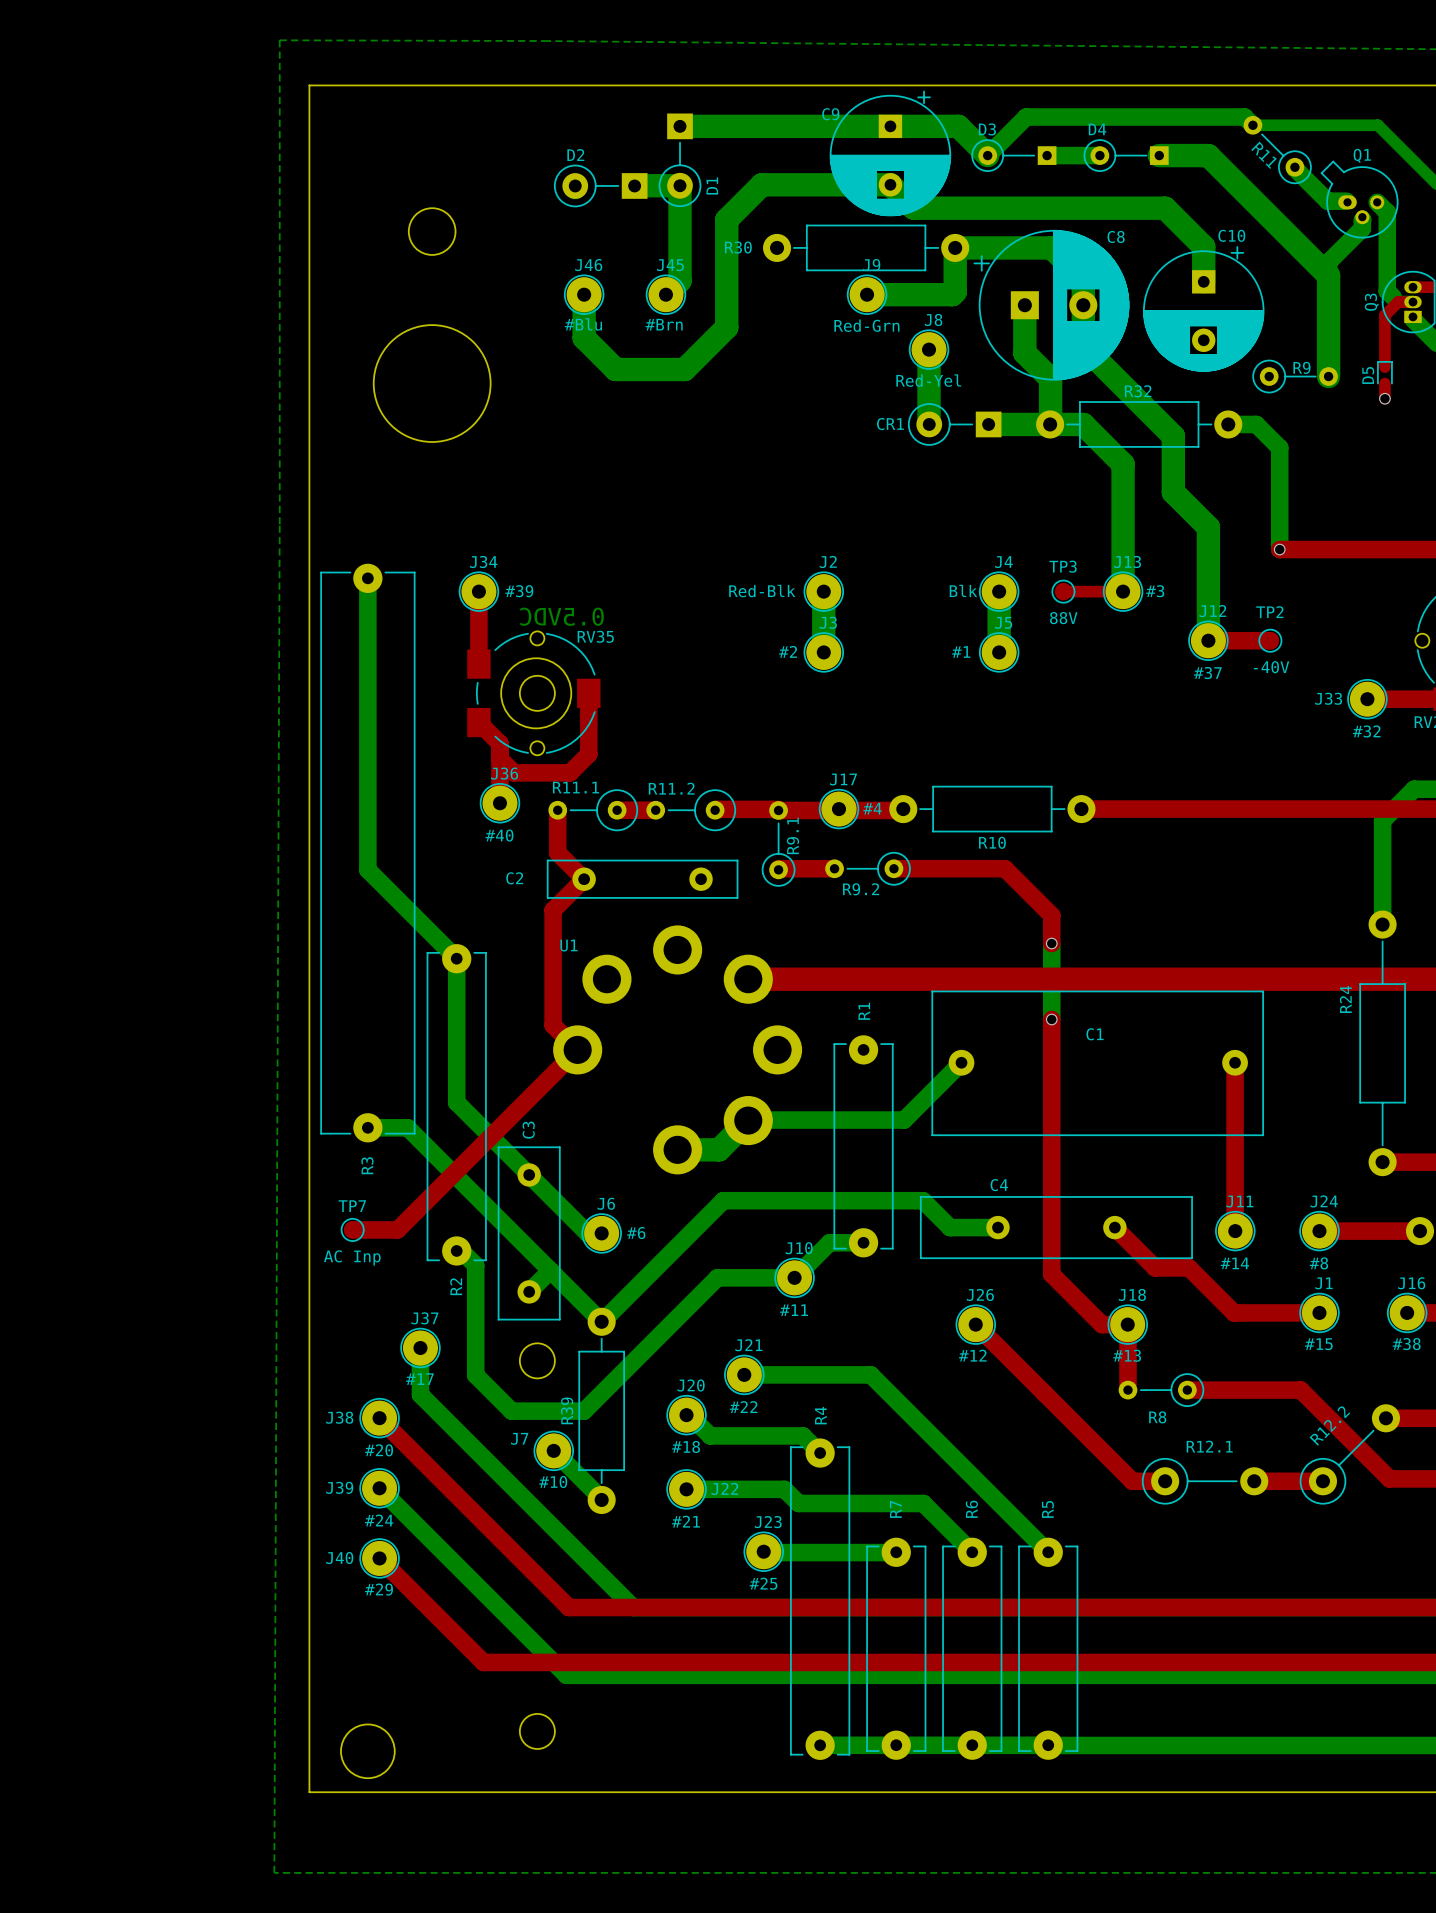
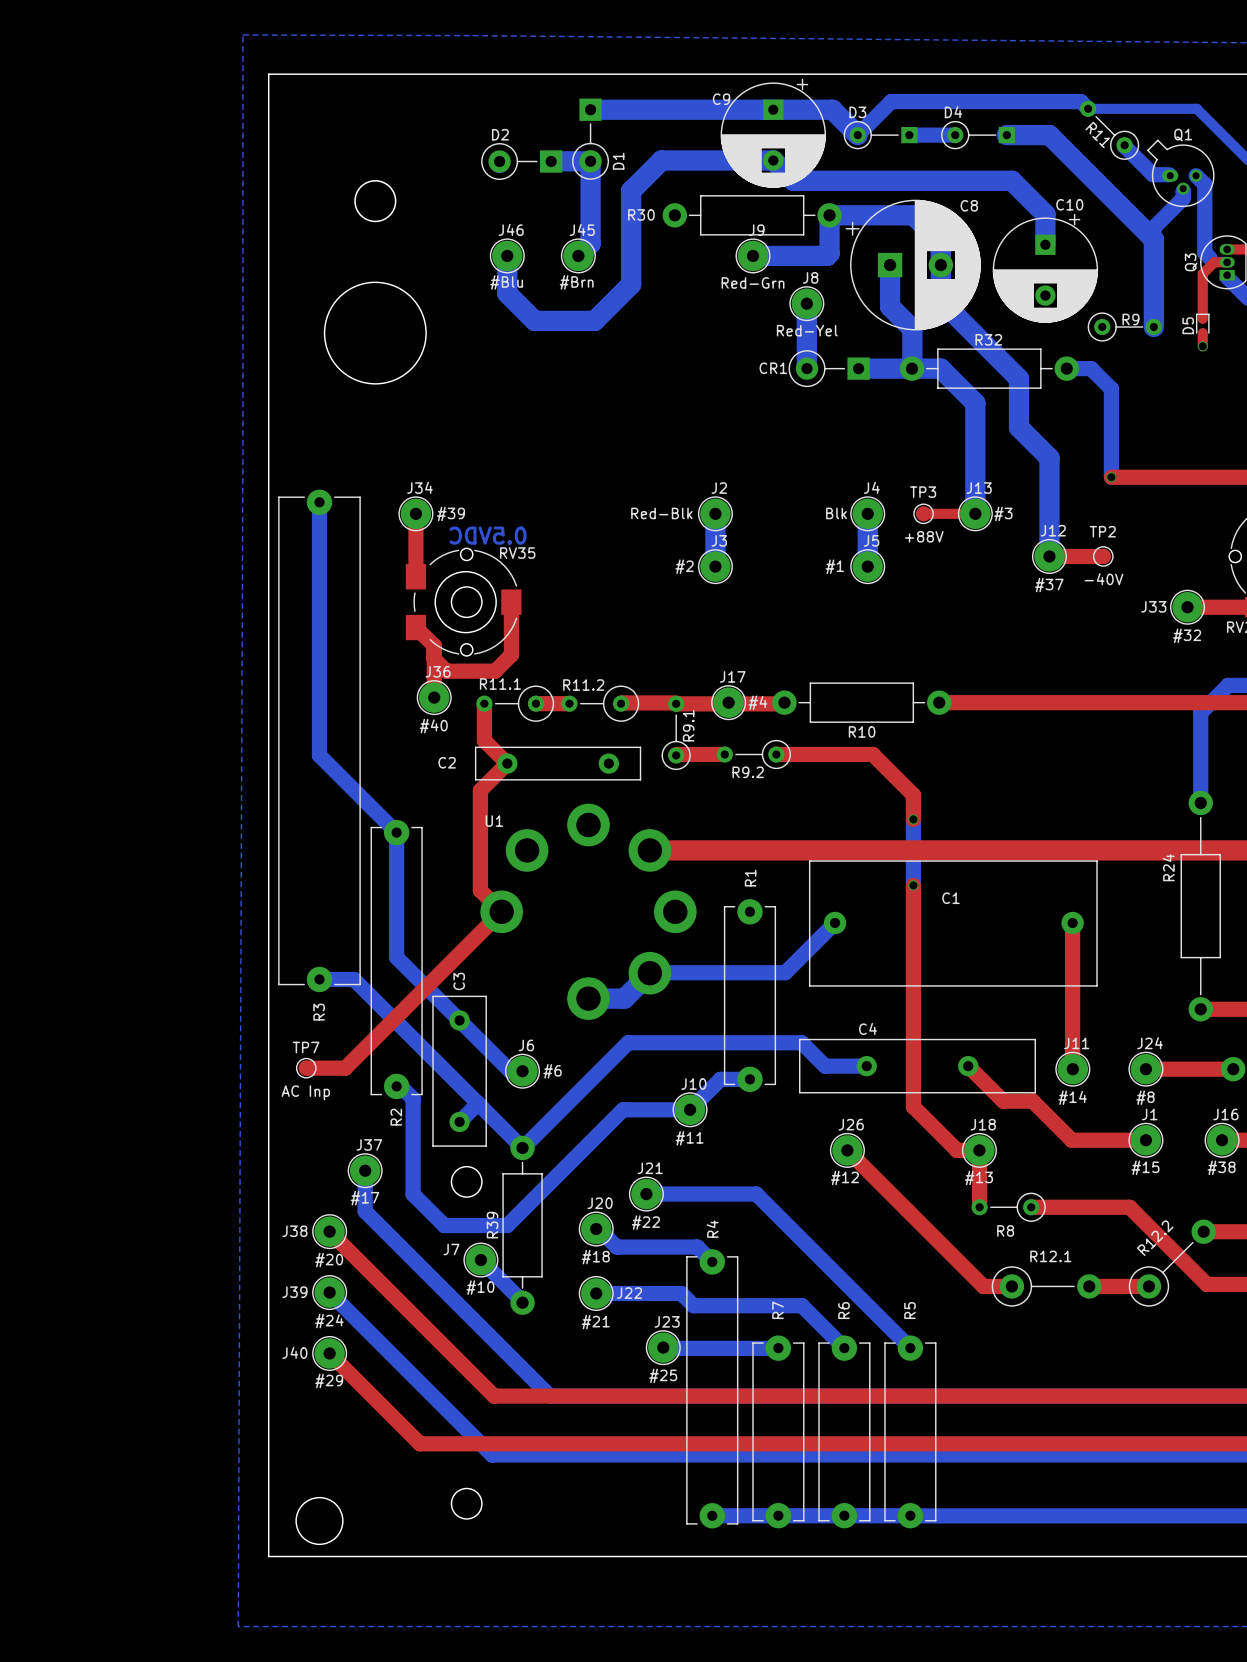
TP3 value: 88V (1063, 618) -> +88V (924, 536)

